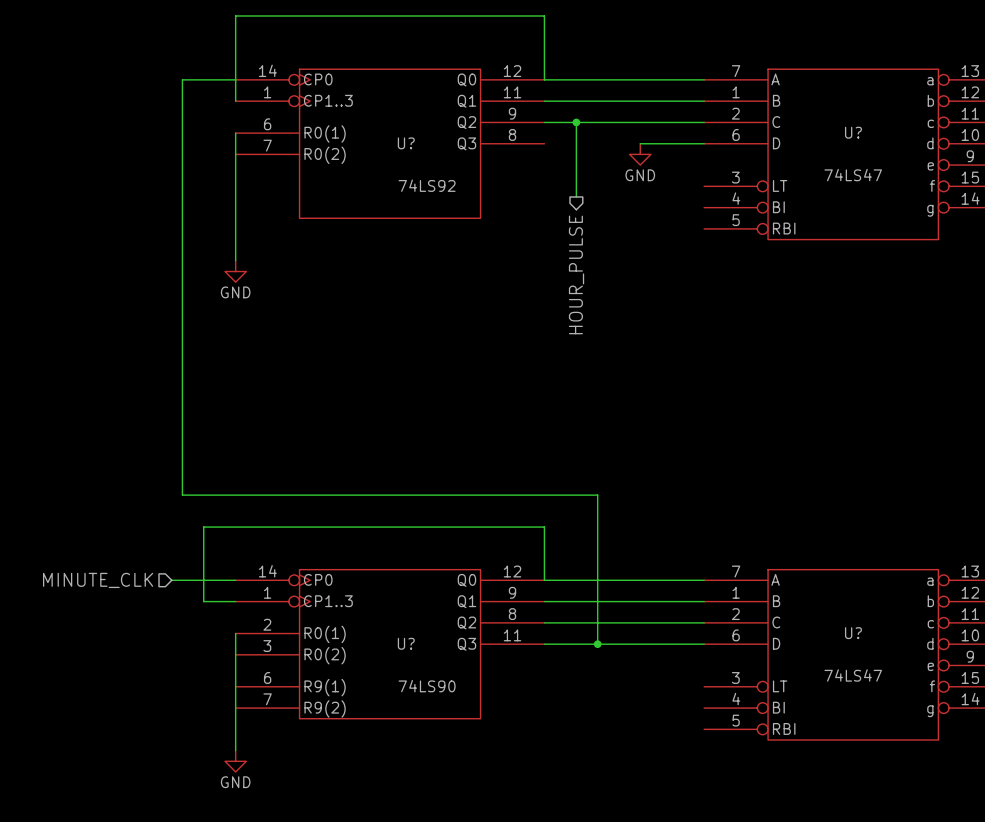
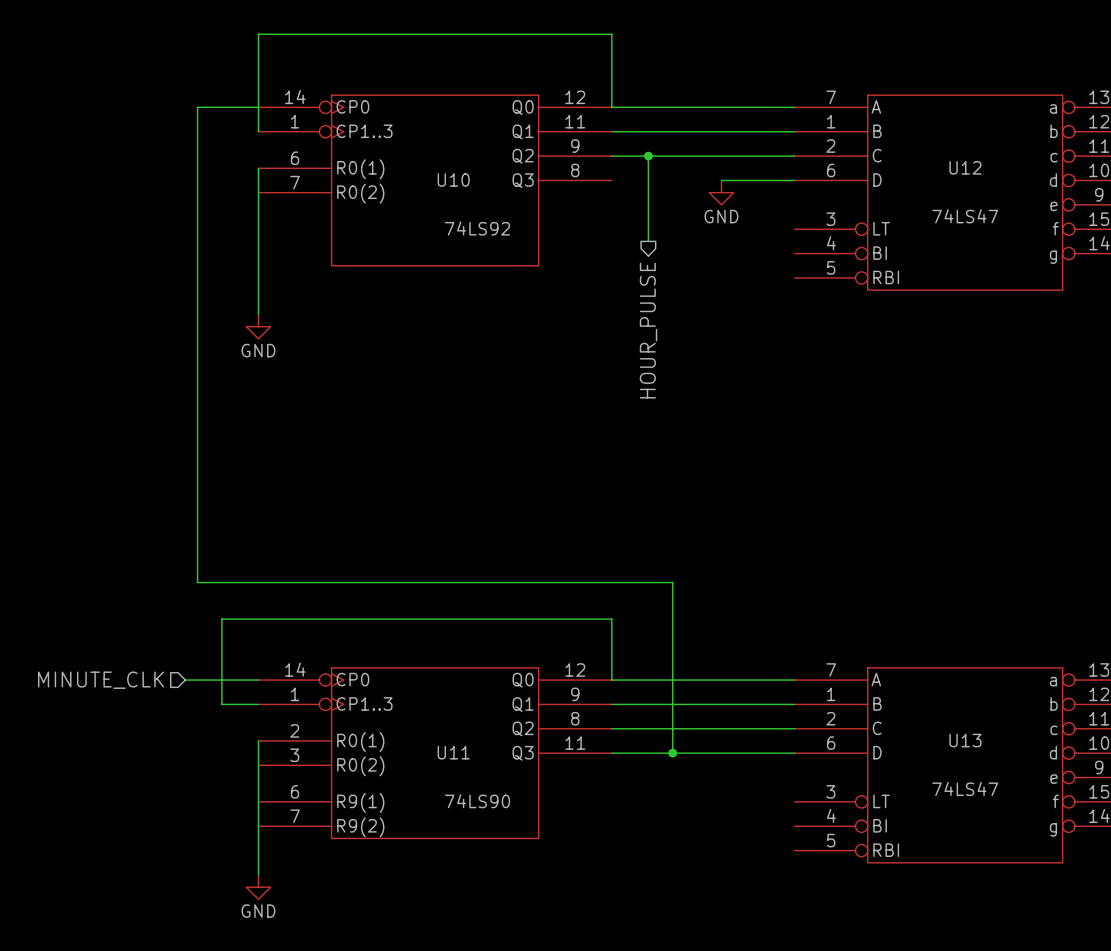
U? name: U? (853, 132) -> U12 (965, 167)
U? name: U? (406, 143) -> U10 (453, 180)
U? name: U? (853, 633) -> U13 (965, 740)
U? name: U? (406, 643) -> U11 (453, 752)

